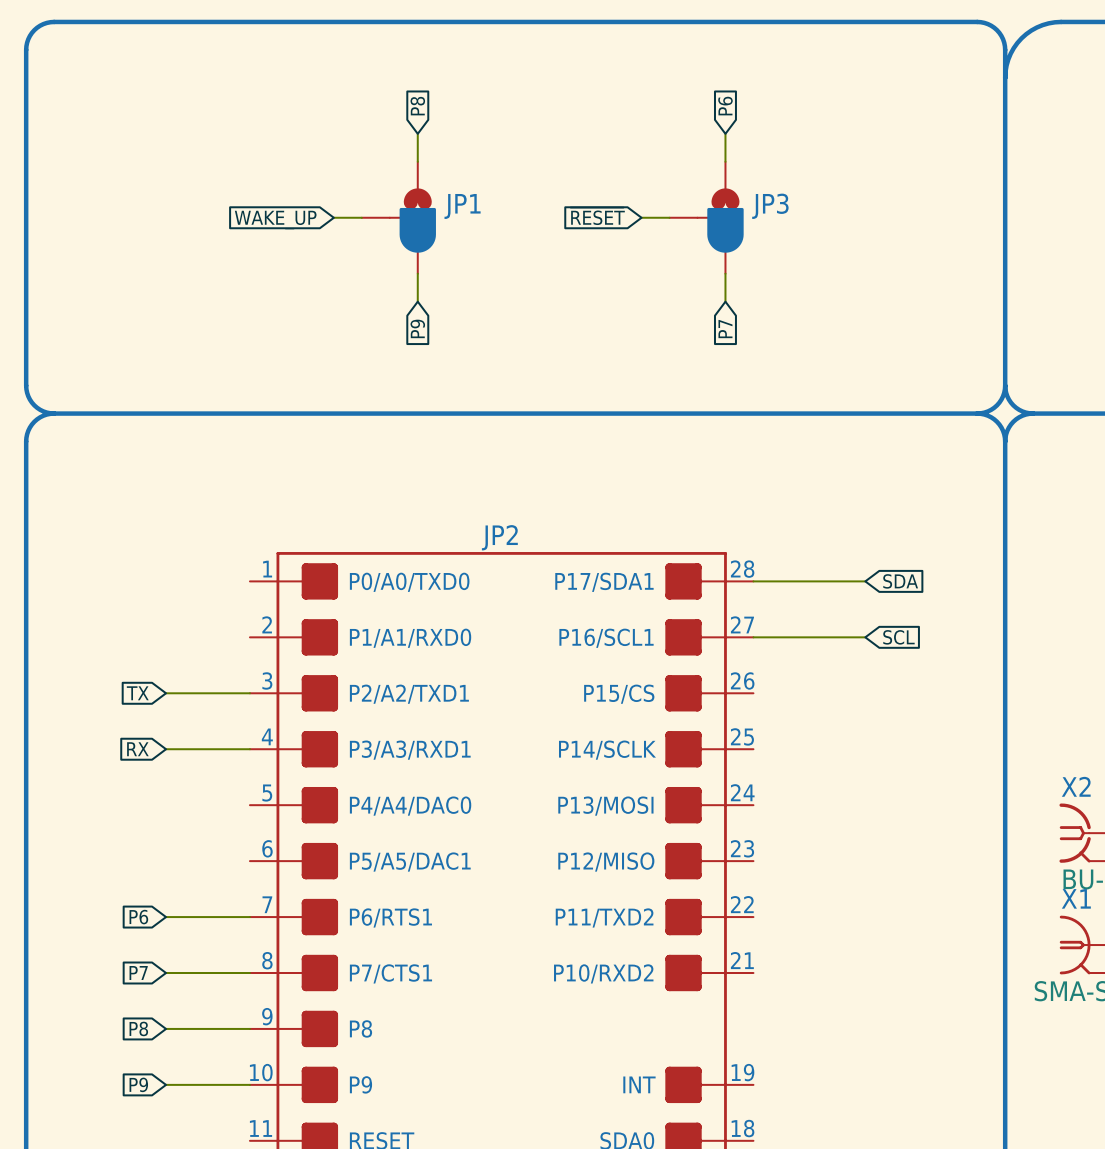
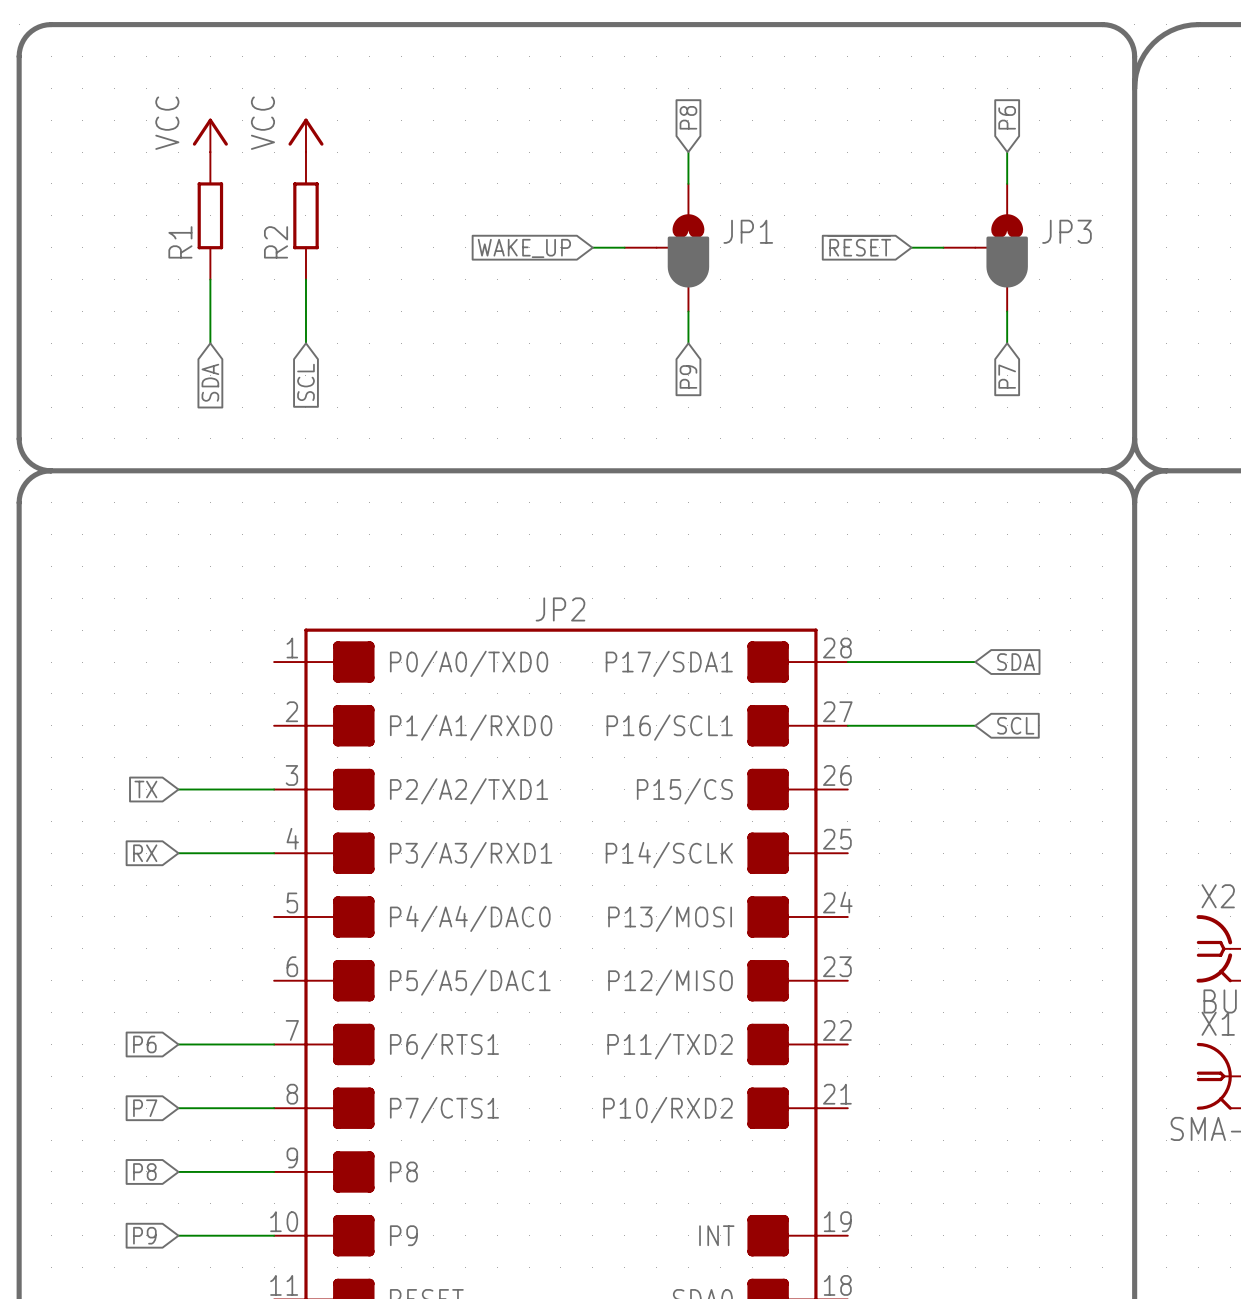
global label position: P8 (417, 106) -> P8 (688, 117)
global label position: P6 (725, 106) -> P6 (1007, 117)
power symbol: none -> VCC (210, 135)
power symbol: none -> VCC (305, 135)
wire: (417, 133) (417, 161) -> none
wire: (725, 133) (725, 161) -> (688, 152) (688, 183)
wire: none -> (1007, 152) (1007, 183)
R1: none -> (210, 215)
R2: none -> (305, 215)
global label position: ~{RESET} (597, 216) -> ~{RESET} (859, 245)
wire: (333, 217) (361, 217) -> none
JP1 position: (398, 217) -> (666, 247)
wire: (641, 217) (669, 217) -> (592, 247) (624, 247)
JP3 position: (706, 217) -> (985, 247)
wire: none -> (911, 247) (943, 247)
global label position: WAKE_UP (275, 220) -> WAKE_UP (524, 248)
wire: none -> (210, 279) (210, 343)
wire: none -> (305, 279) (305, 343)
wire: (417, 273) (417, 301) -> none
wire: (725, 273) (725, 301) -> (688, 311) (688, 343)
wire: none -> (1007, 311) (1007, 343)
global label position: P9 (417, 328) -> P9 (688, 376)
global label position: P7 (725, 329) -> P7 (1007, 376)
global label: none -> SCL (305, 382)
global label: none -> SDA (210, 382)

